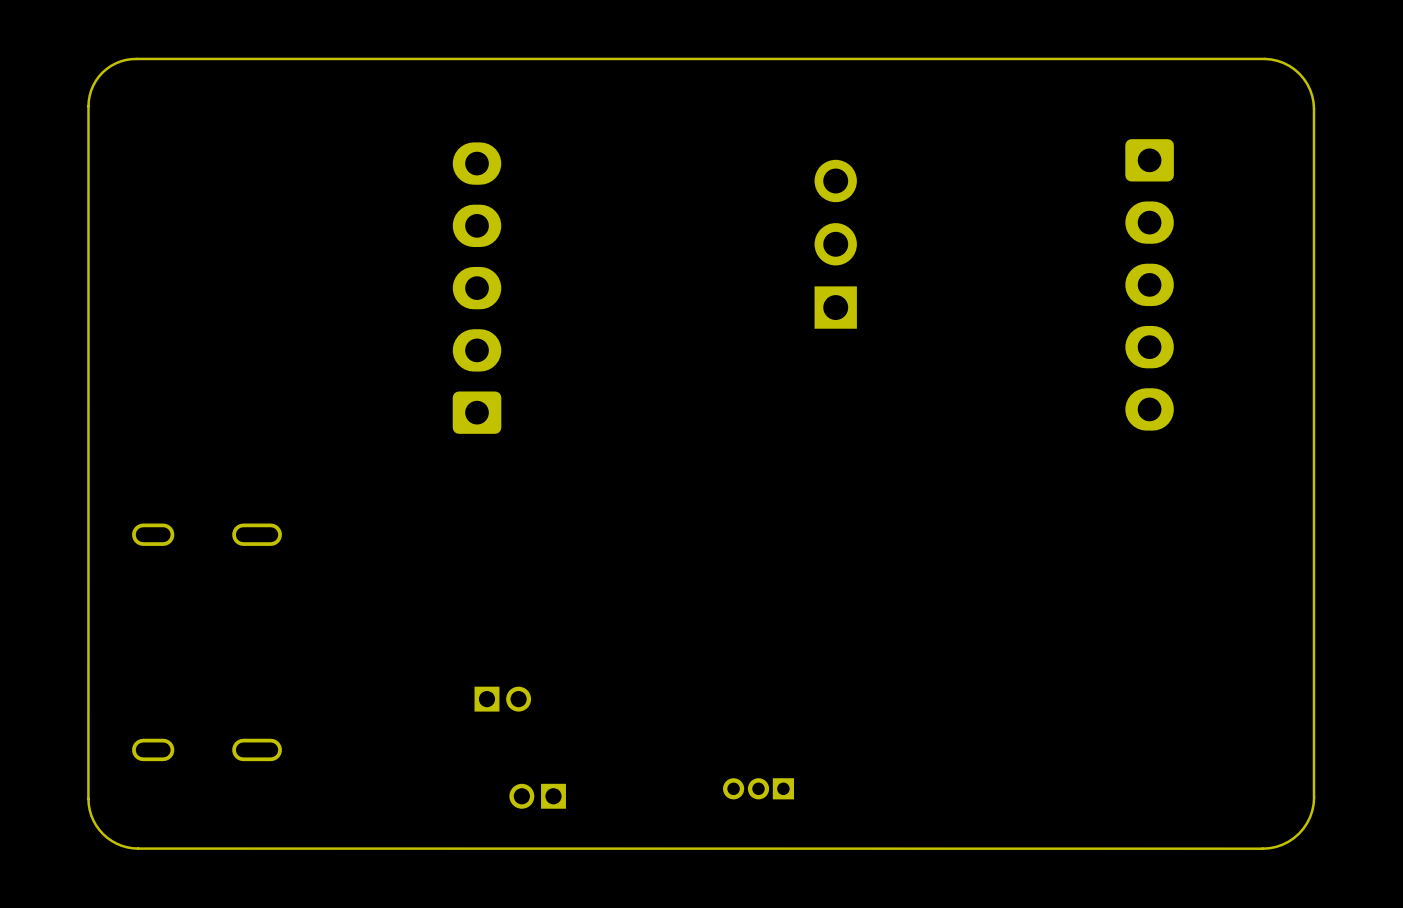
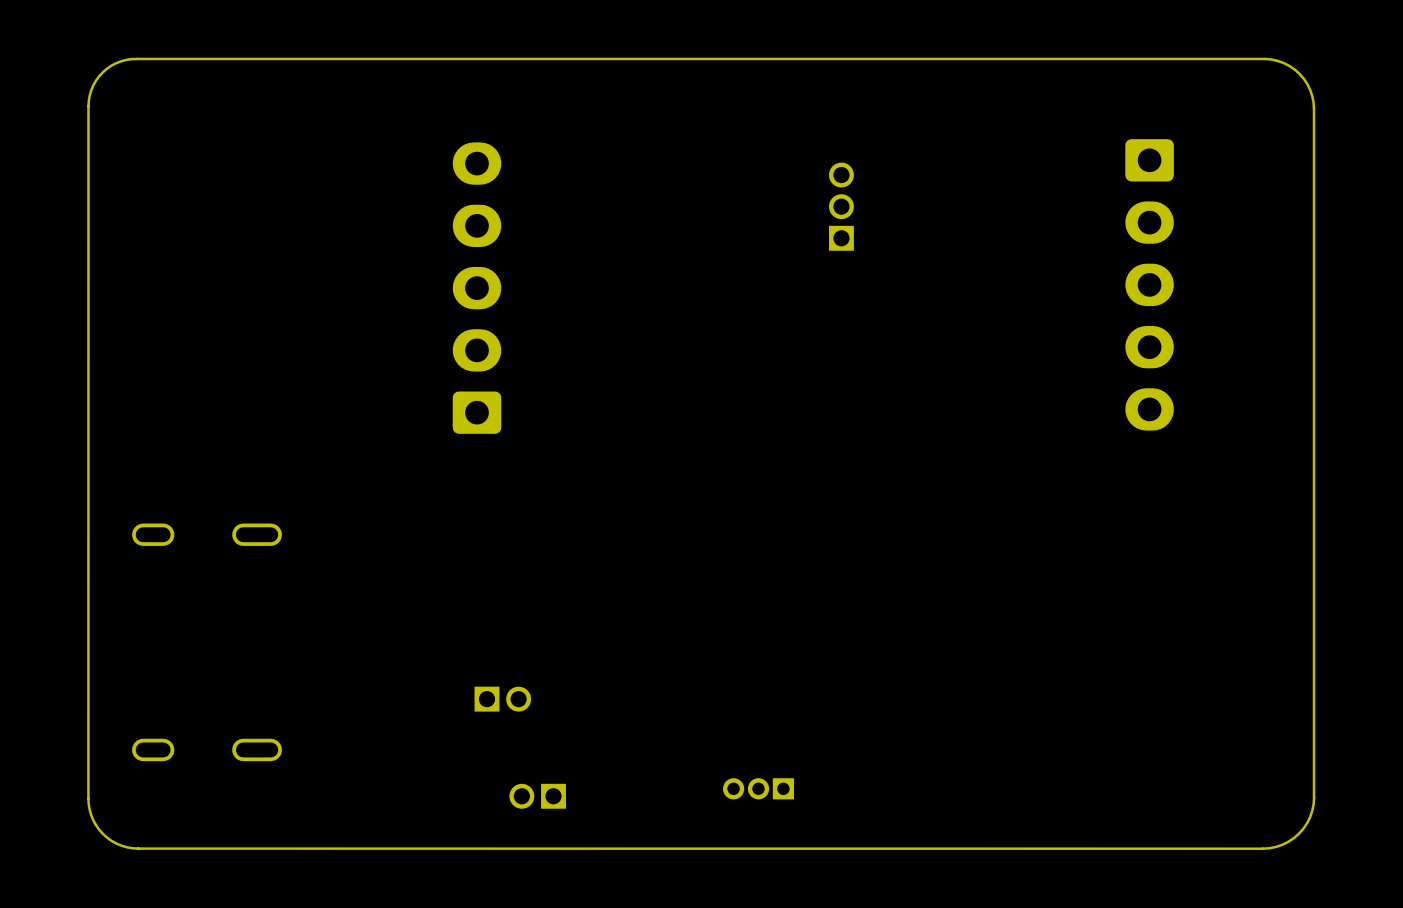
part: none -> (841, 206)
part: (835, 244) -> none

